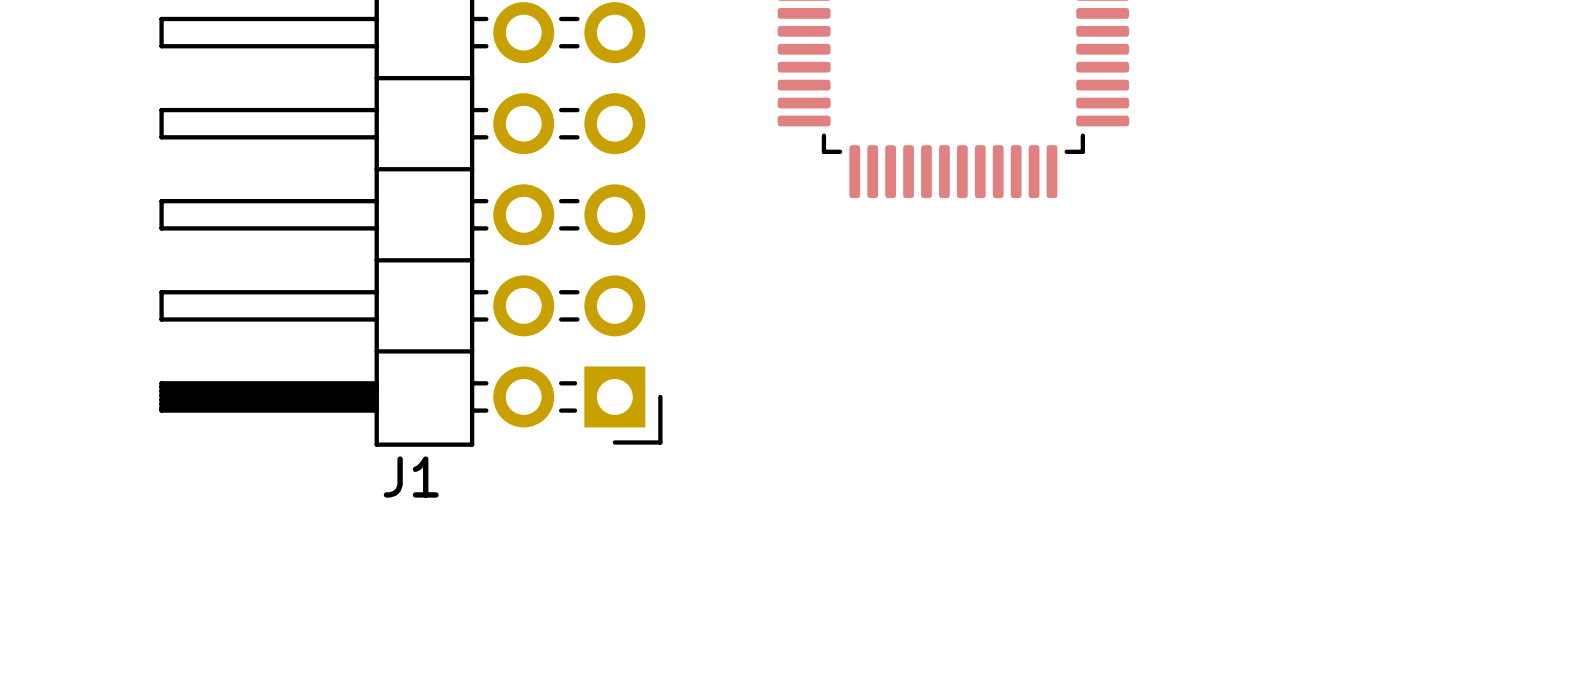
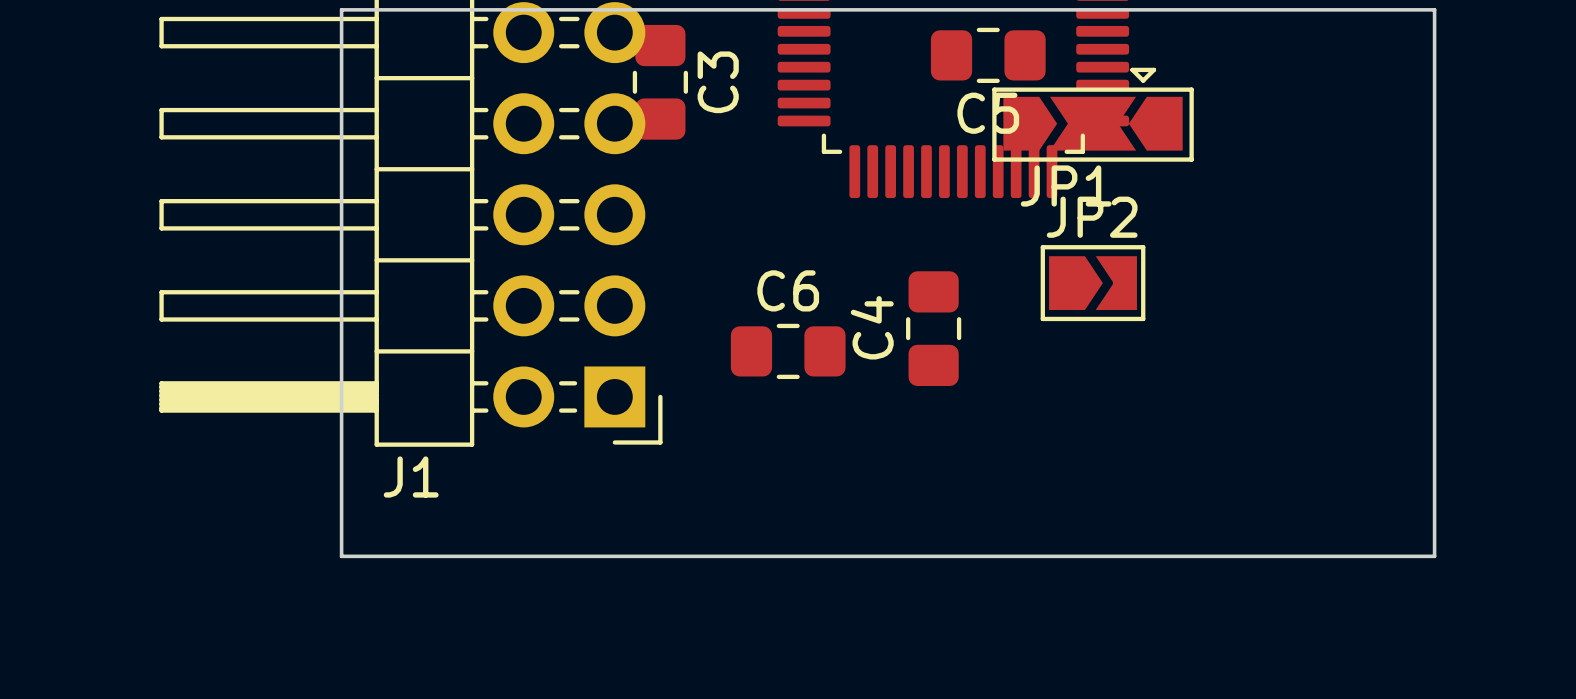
board edge: none -> (341, 9) (1434, 9) (1434, 556) (341, 556) (341, 9)
C5: none -> (988, 55)
C3: none -> (660, 82)
JP1: none -> (1093, 114)
JP2: none -> (1093, 283)
C4: none -> (933, 328)
C6: none -> (788, 351)

